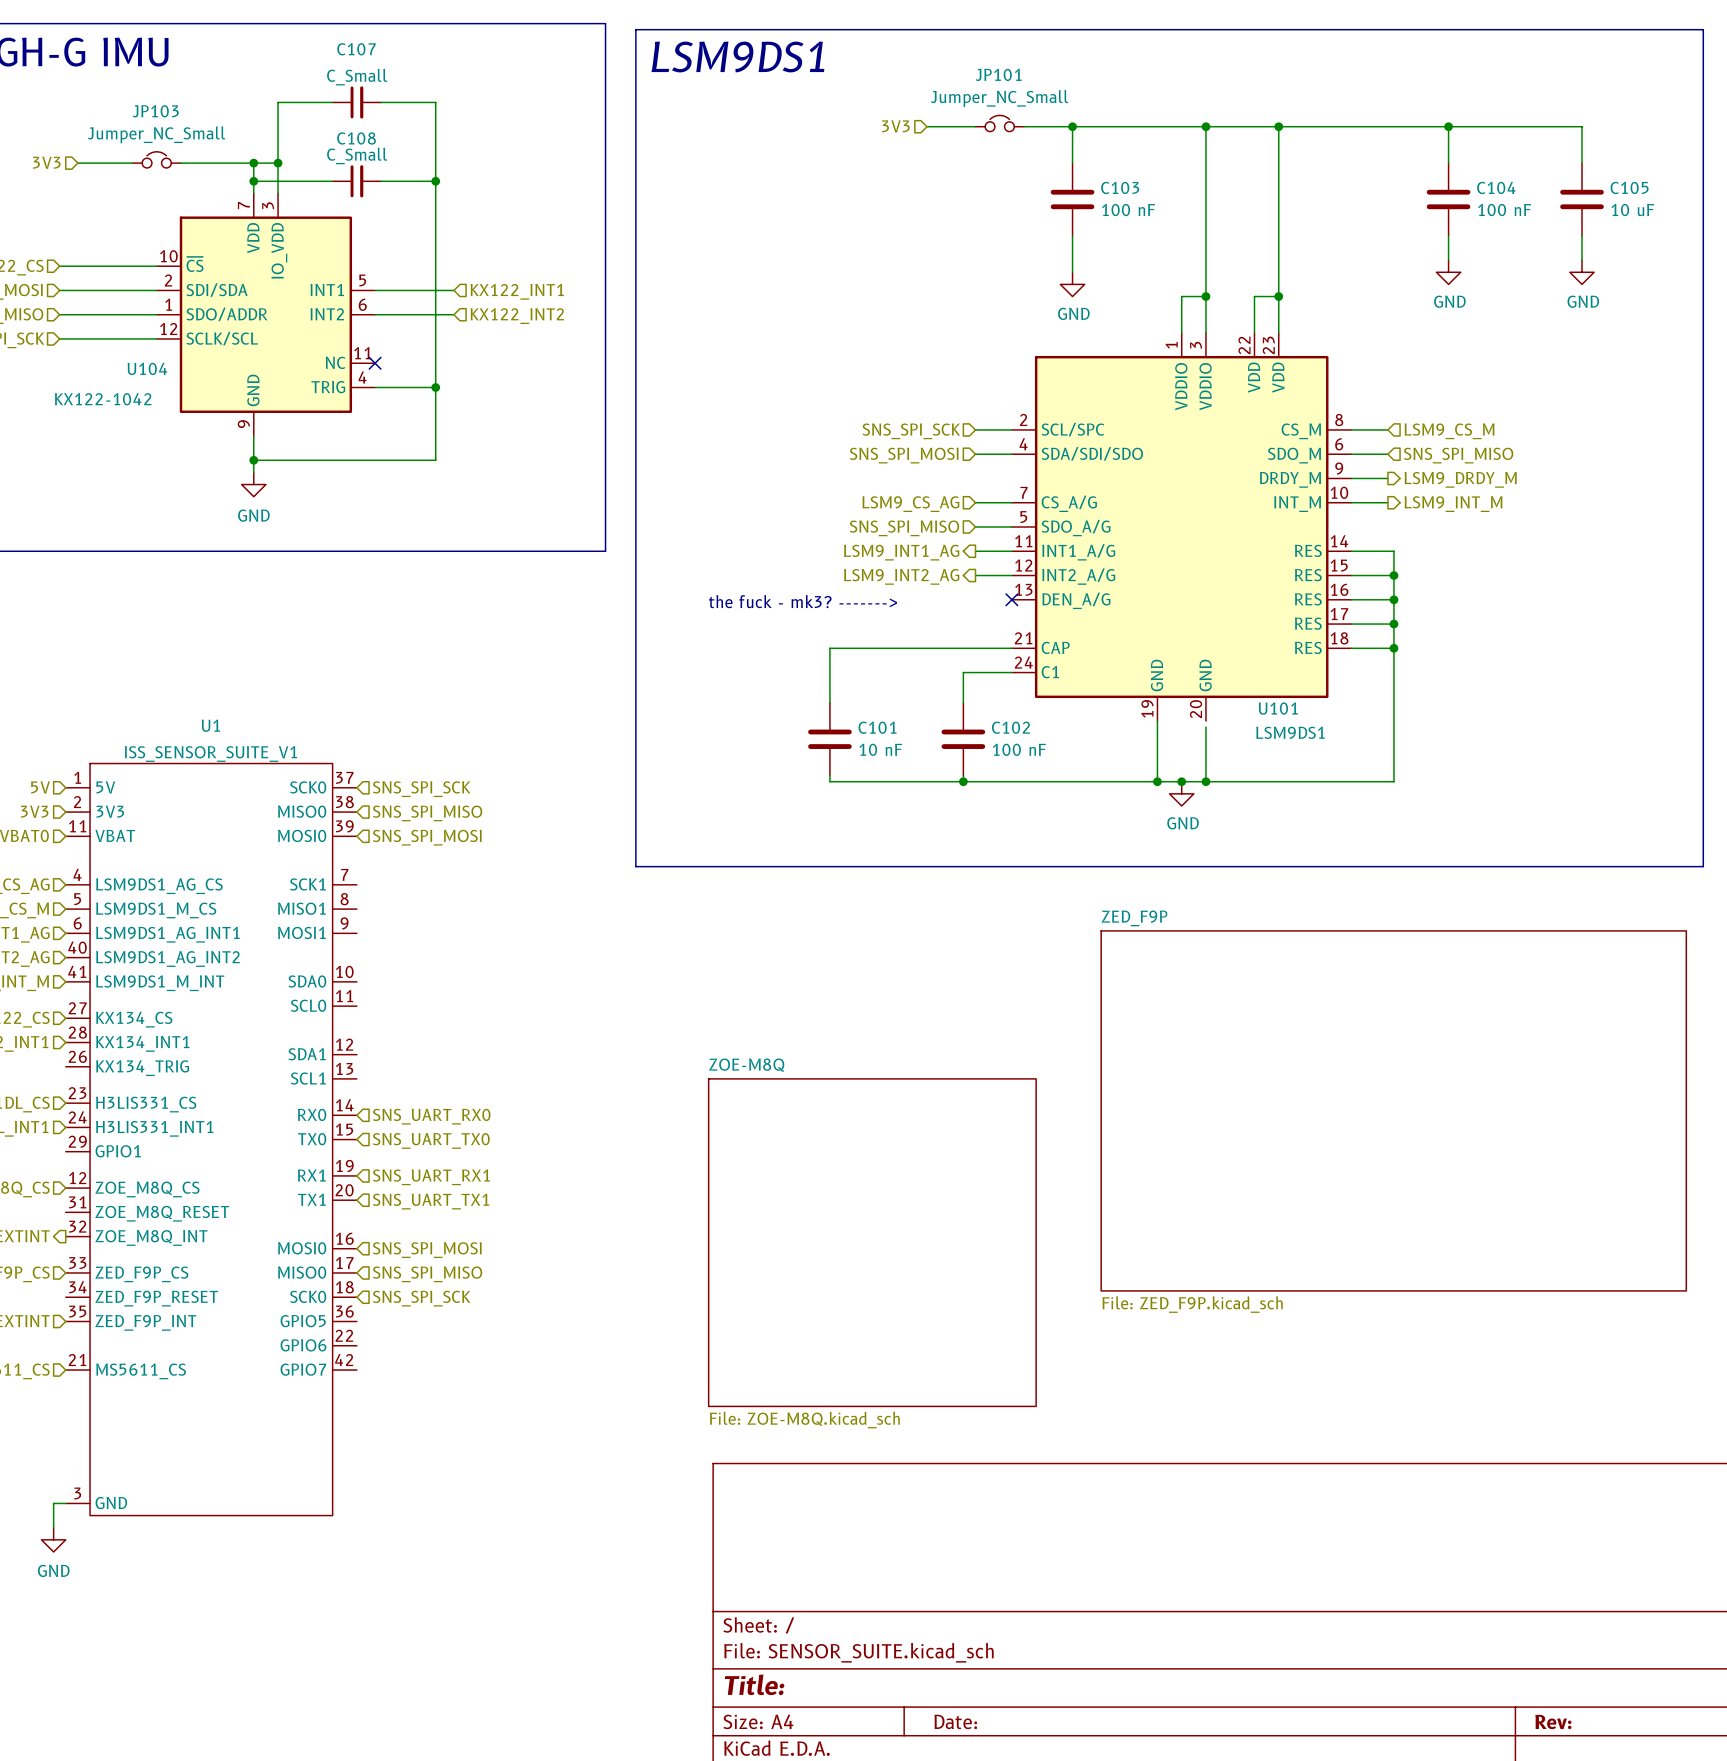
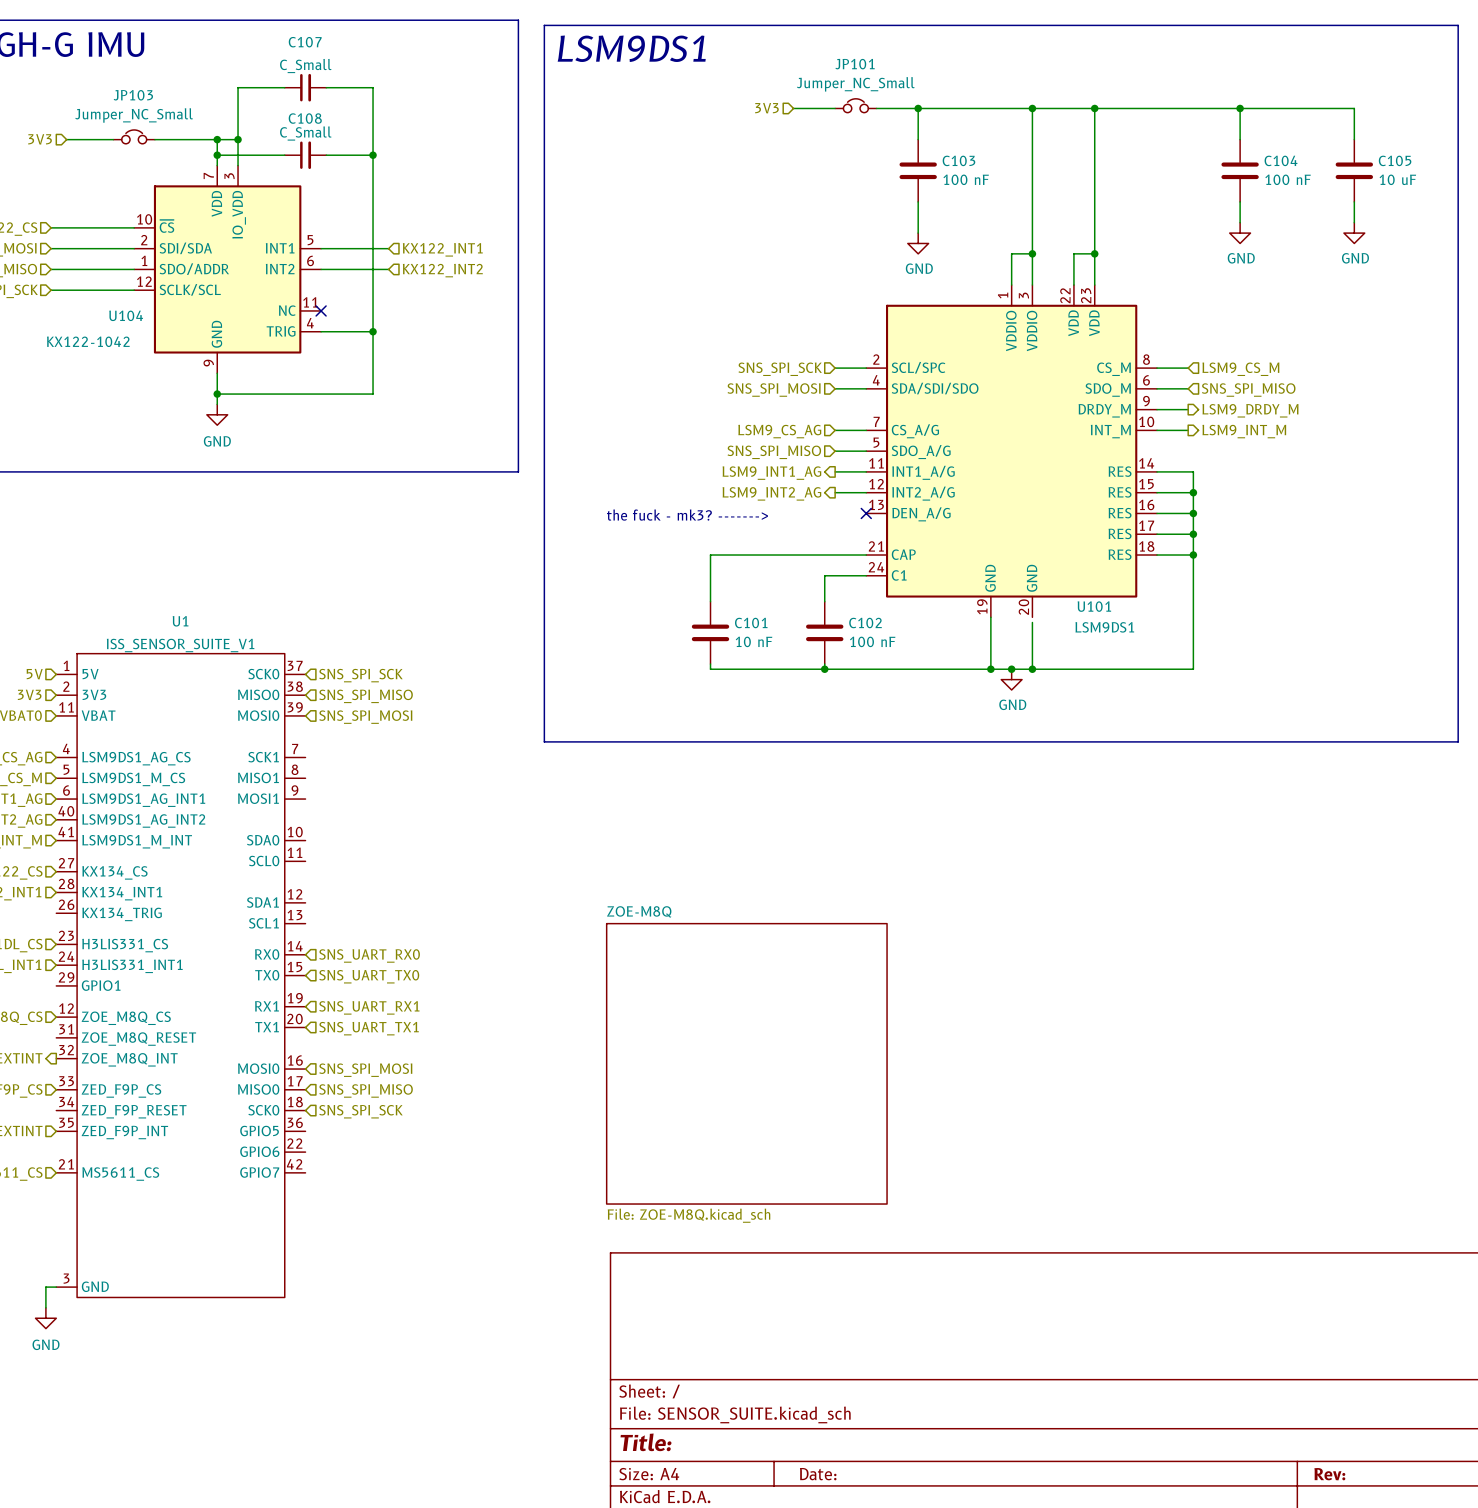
sheet ZED_F9P: File: ZED_F9P.kicad_sch (1393, 1110) -> none

